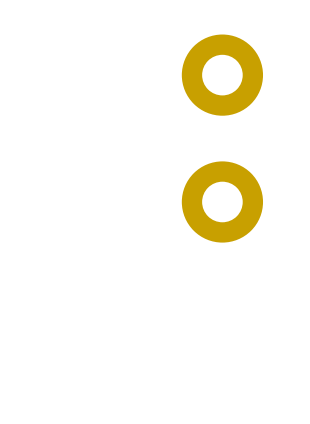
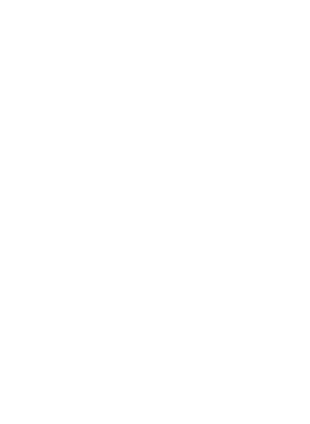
part: (222, 138) -> none

